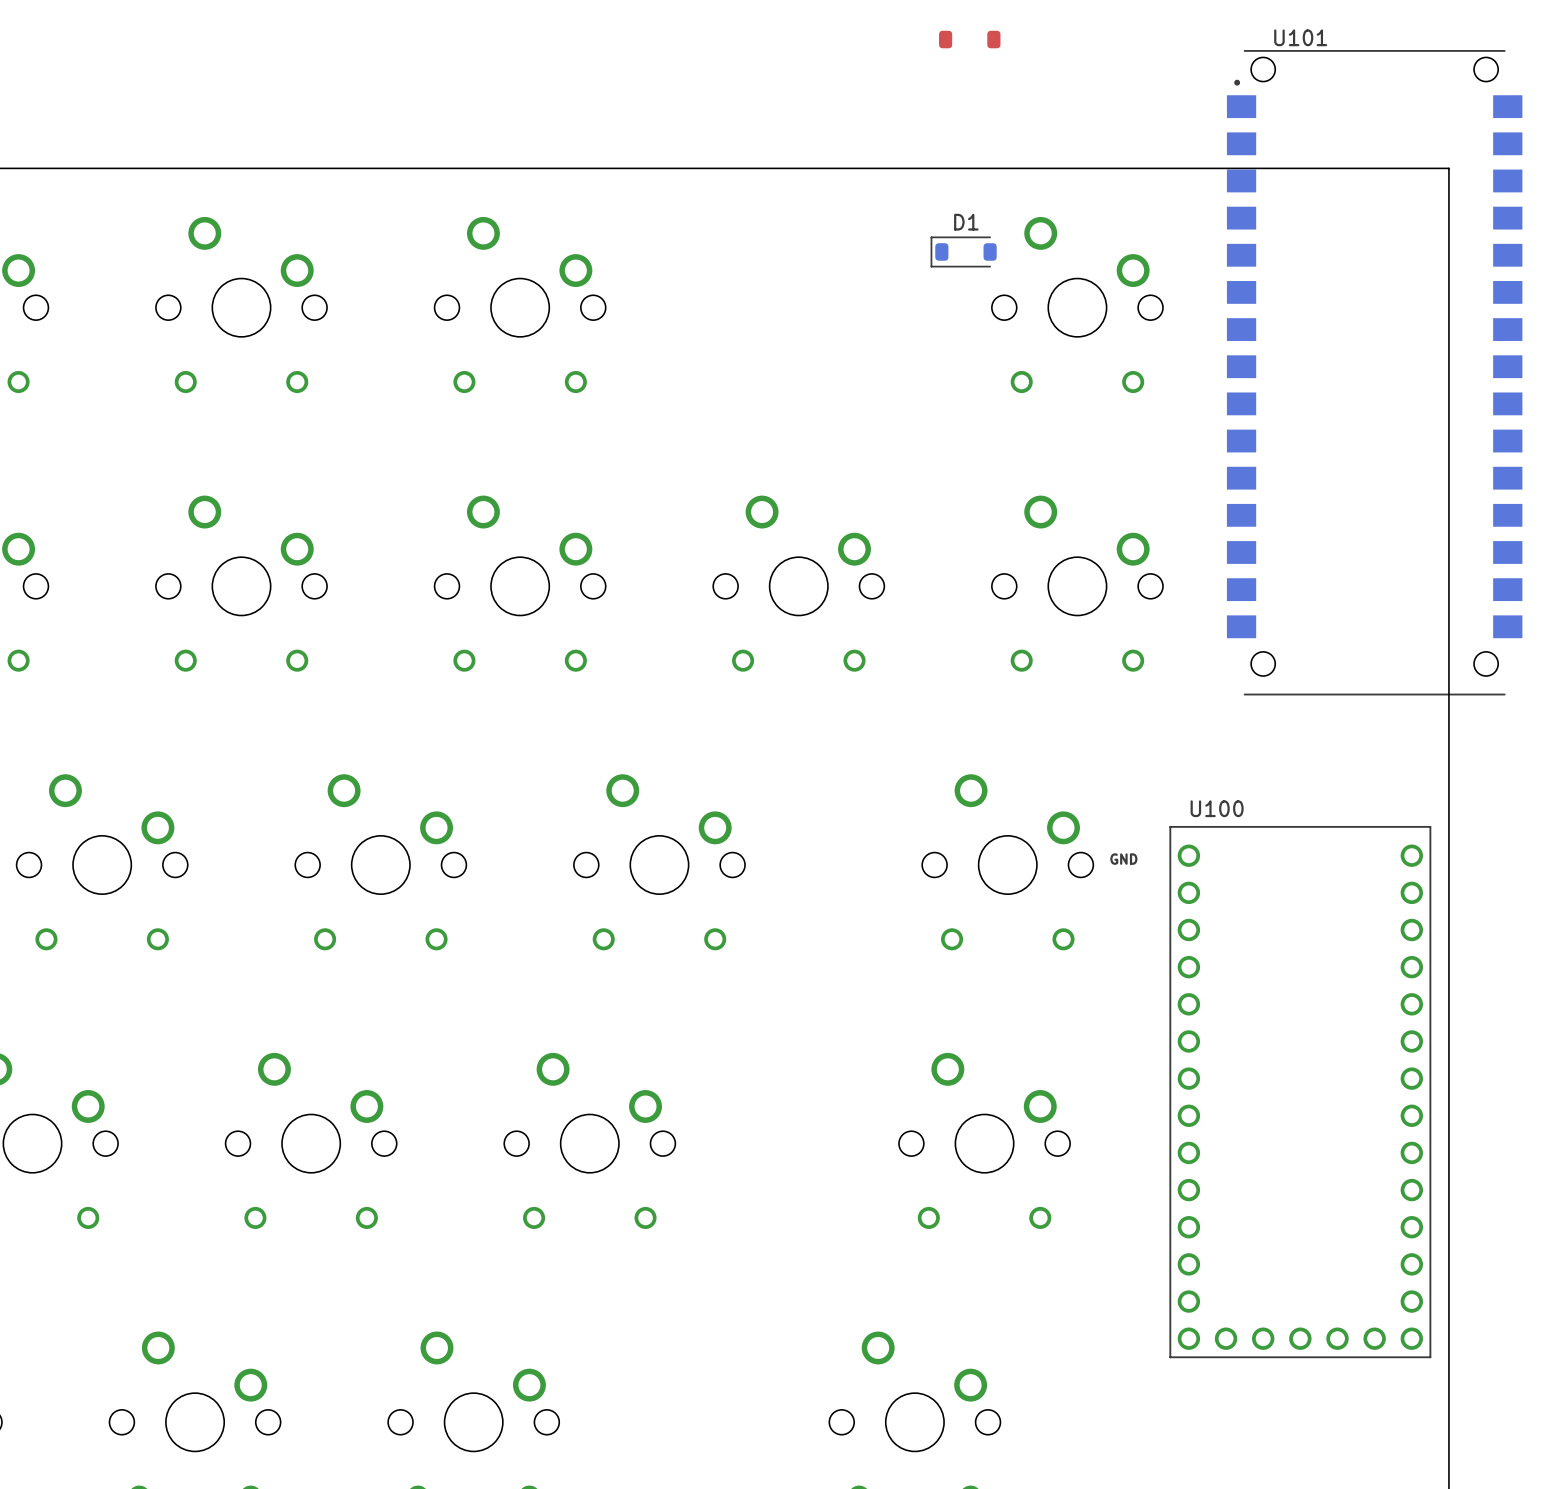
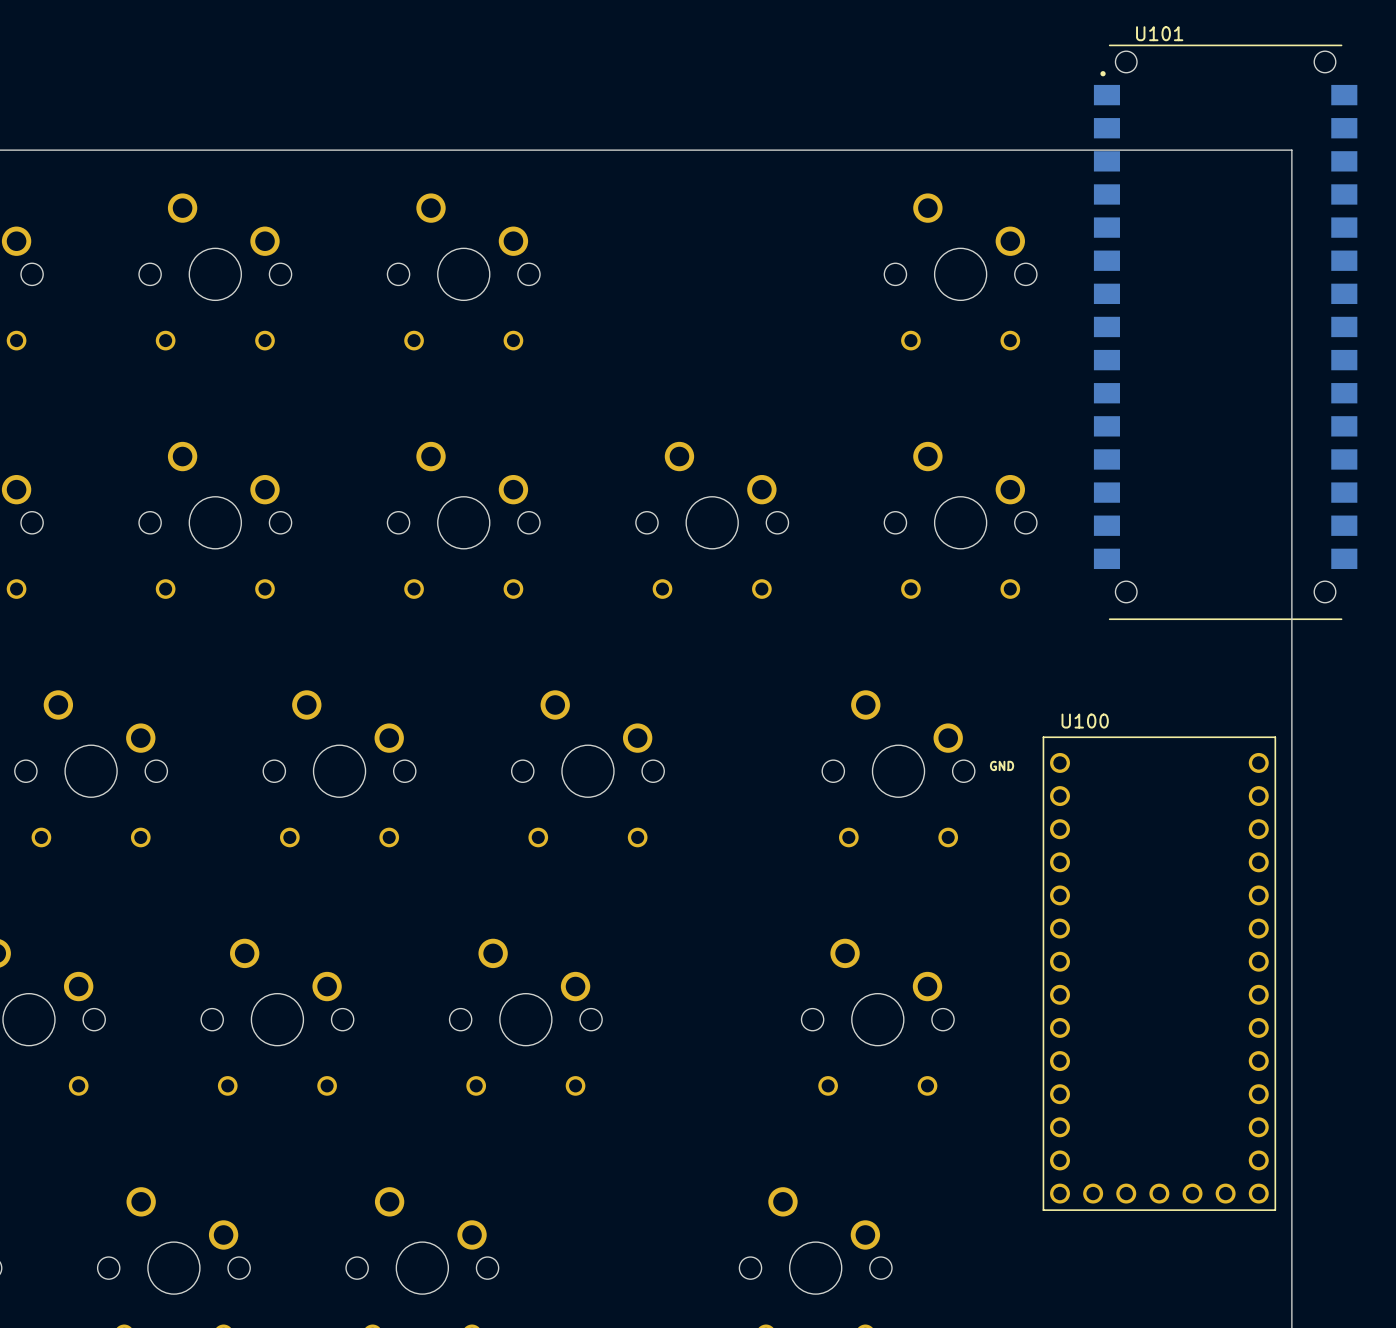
part: (969, 39) -> none
D1: (963, 251) -> none

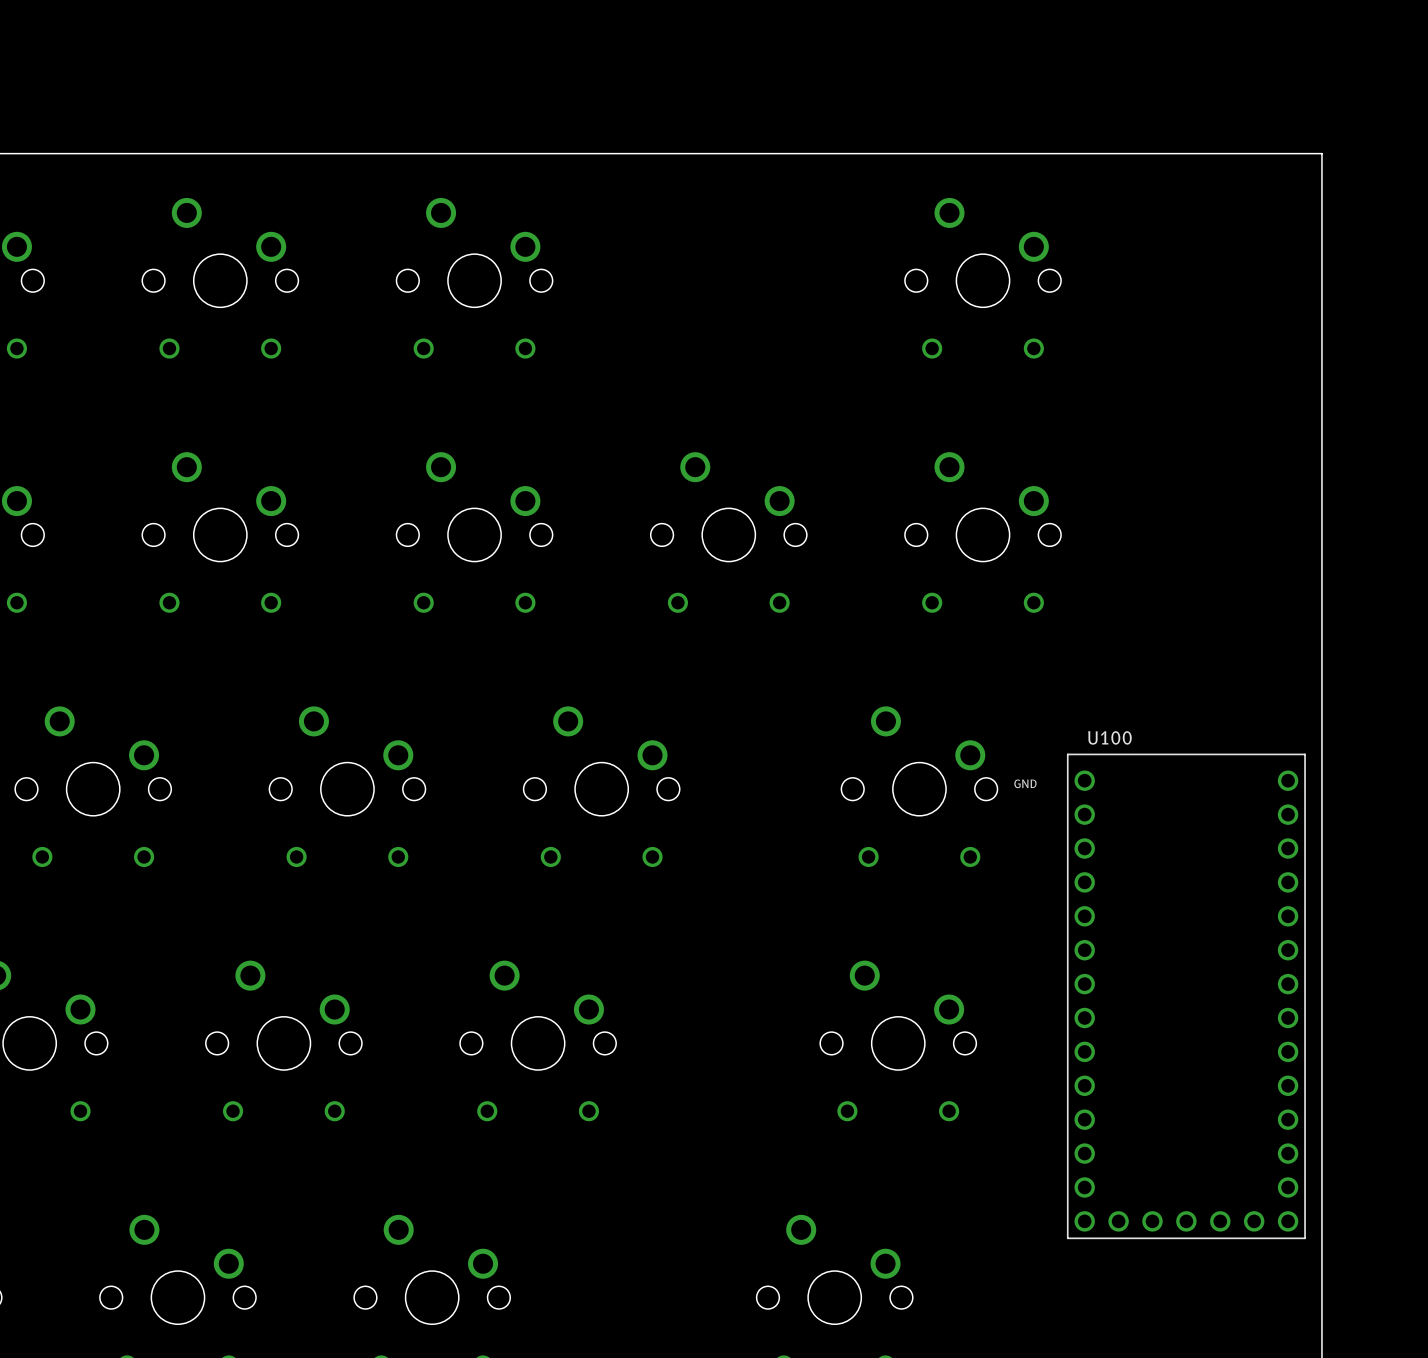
U101: (1225, 332) -> none

